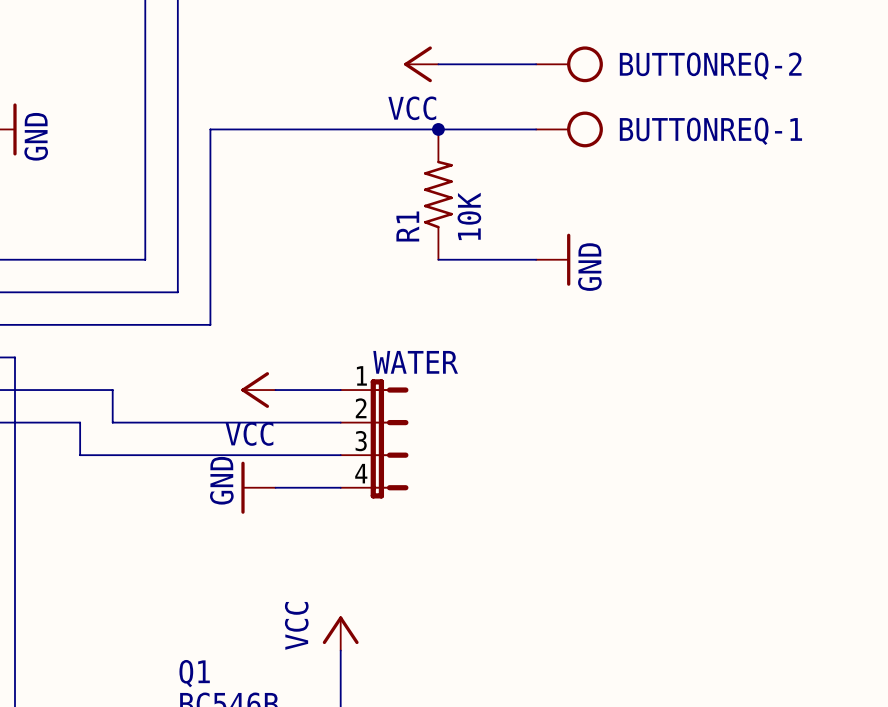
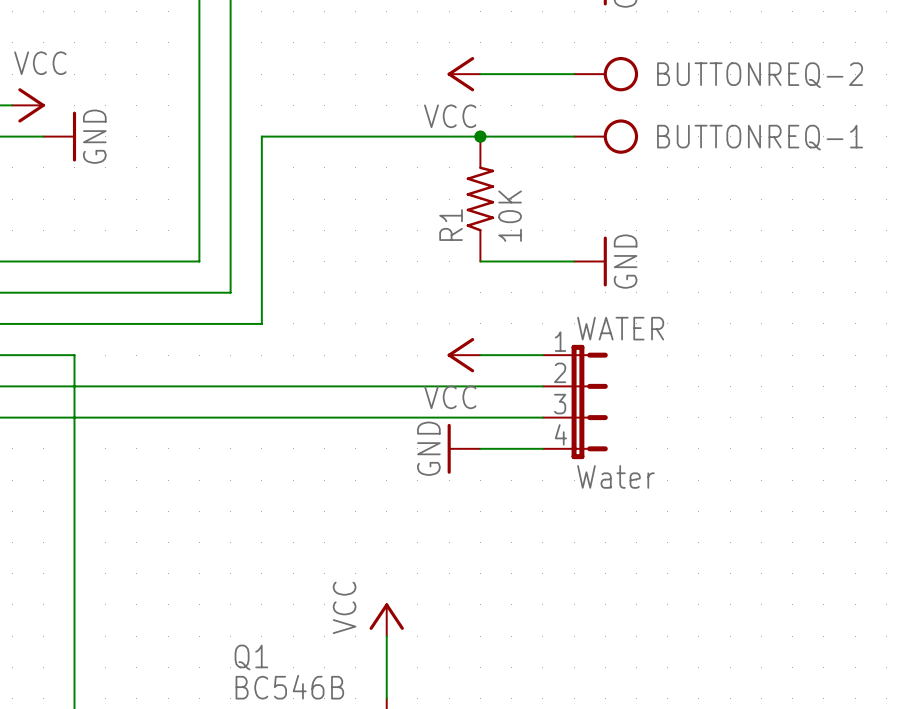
wire: none -> (480, 355) (542, 355)
wire: (112, 390) (112, 422) -> (136, 417) (168, 417)
wire: none -> (168, 386) (324, 386)
power symbol position: VCC (258, 390) -> VCC (464, 355)
wire: none -> (386, 386) (542, 386)
WATER: none -> Water (575, 401)
wire: (80, 422) (80, 455) (340, 455) -> none
wire: none -> (386, 417) (542, 417)
WATER: (374, 438) -> none
power symbol position: GND (258, 487) -> GND (464, 448)
wire: (275, 487) (340, 487) -> (480, 448) (542, 448)

